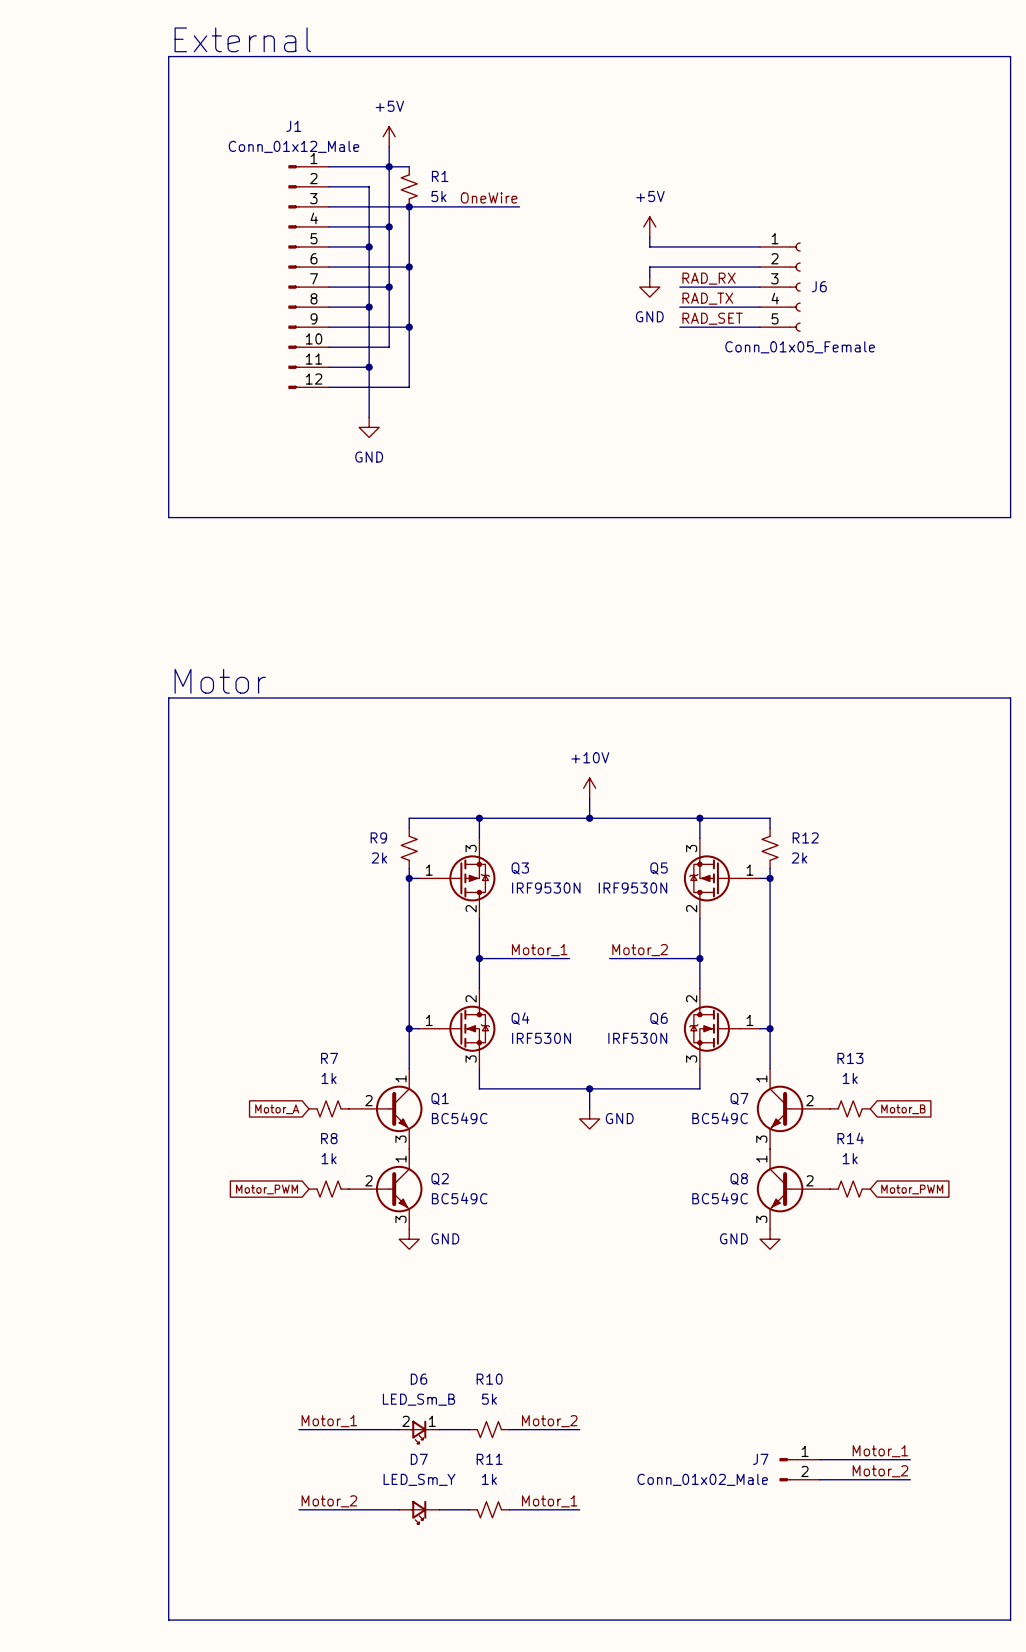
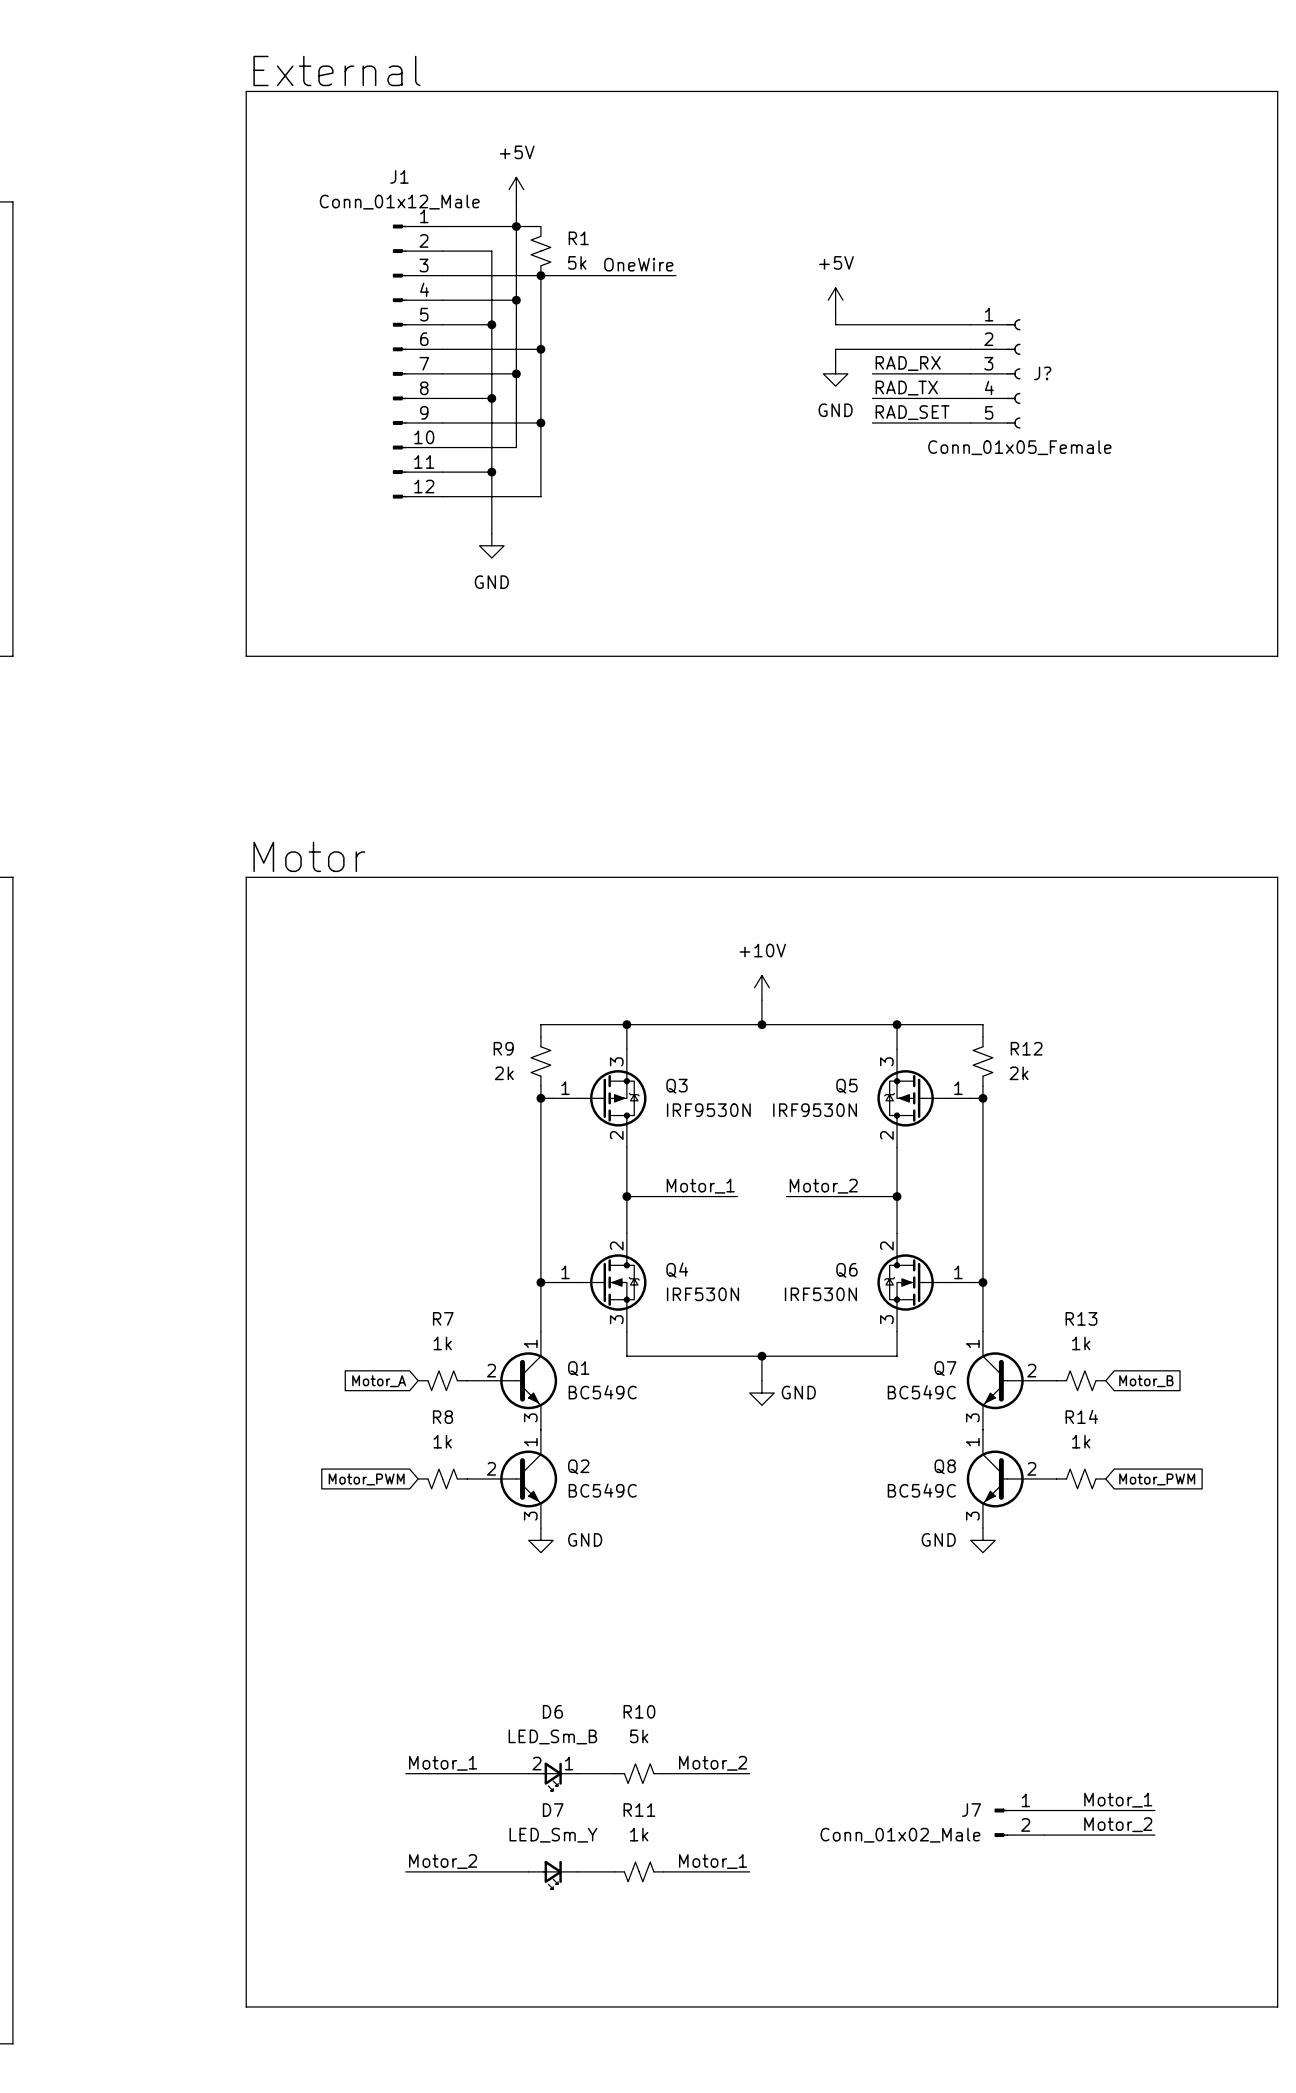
J6 name: J6 (819, 286) -> J? (1042, 373)

